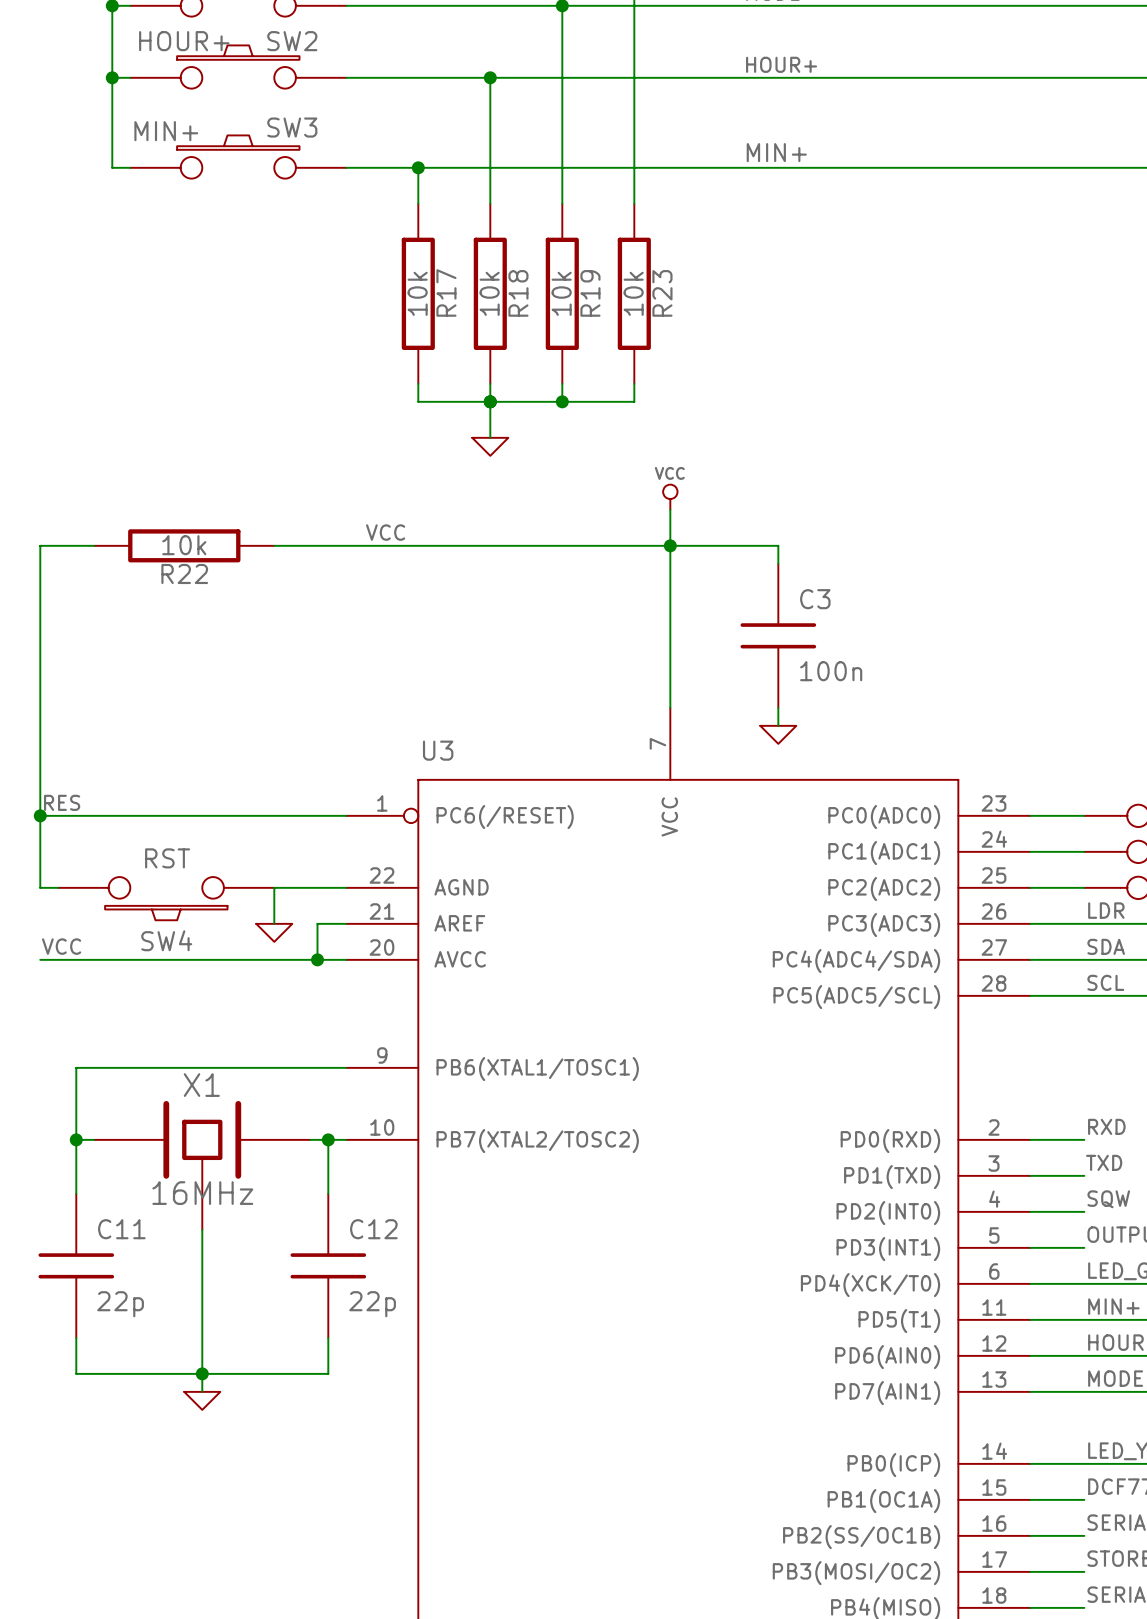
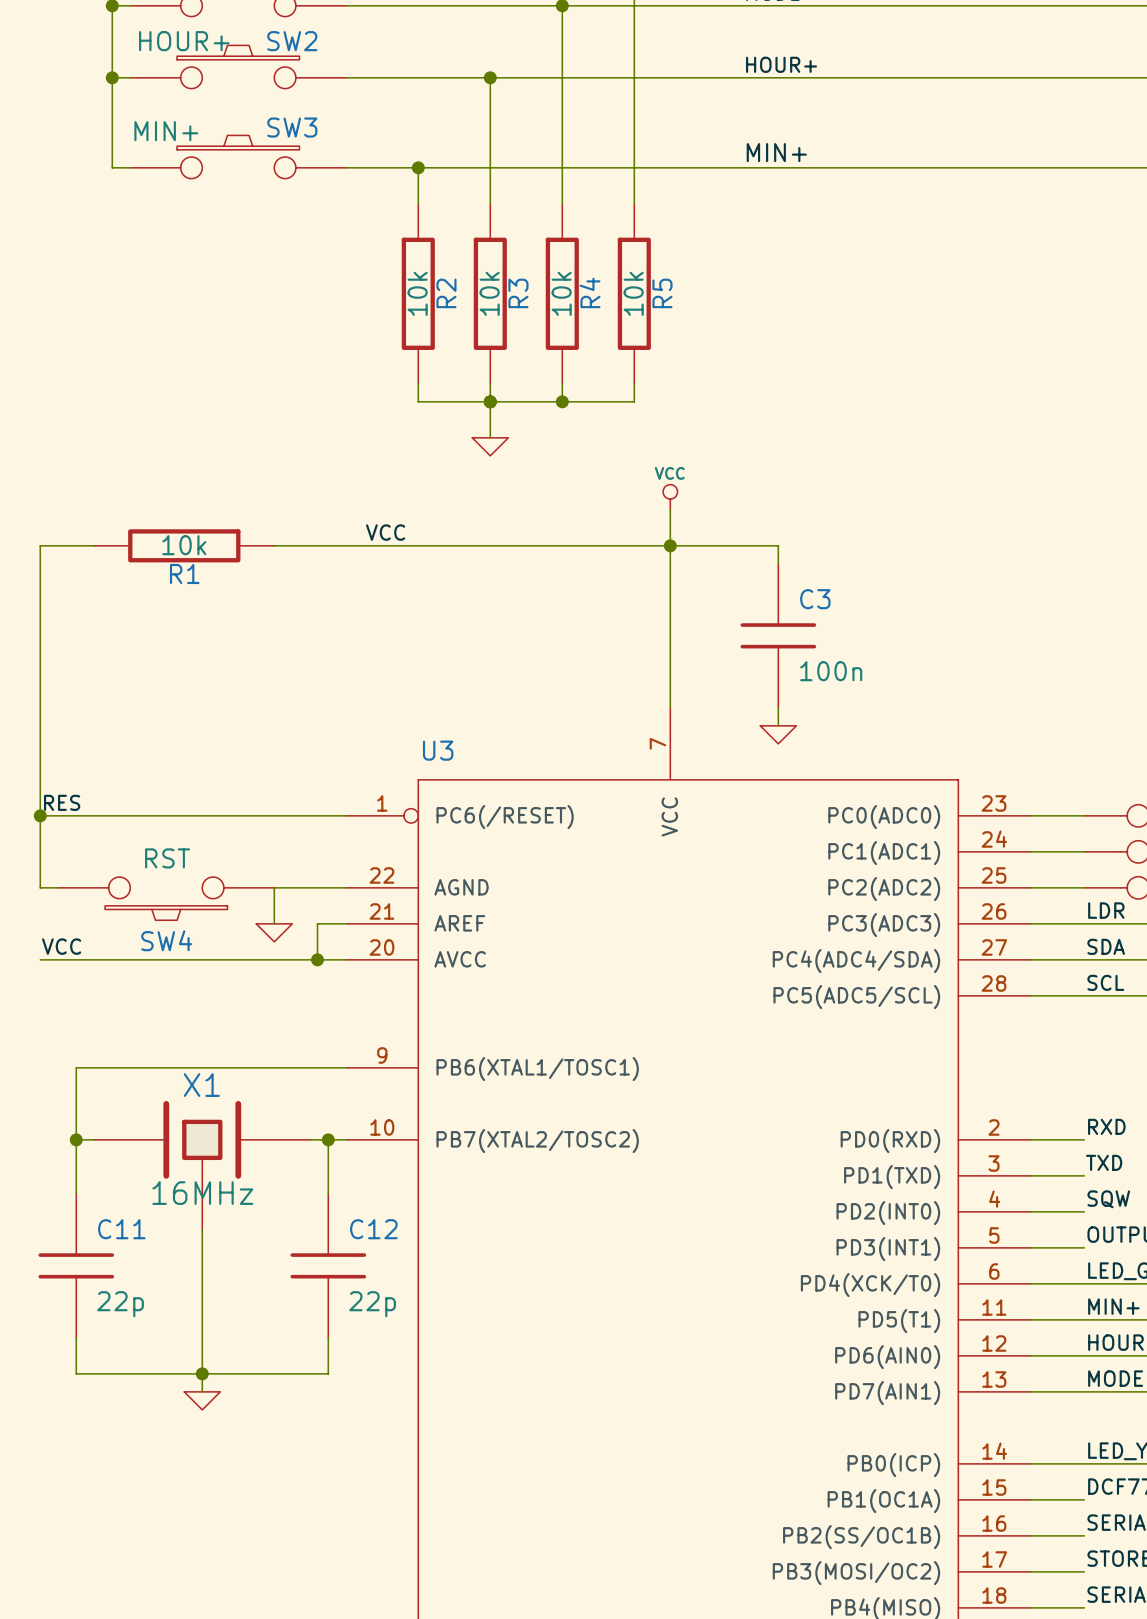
R17 name: R17 (446, 292) -> R2 (446, 293)
R18 name: R18 (518, 293) -> R3 (518, 293)
R19 name: R19 (590, 293) -> R4 (590, 292)
R23 name: R23 (662, 293) -> R5 (662, 293)
R22 name: R22 (184, 573) -> R1 (184, 573)

